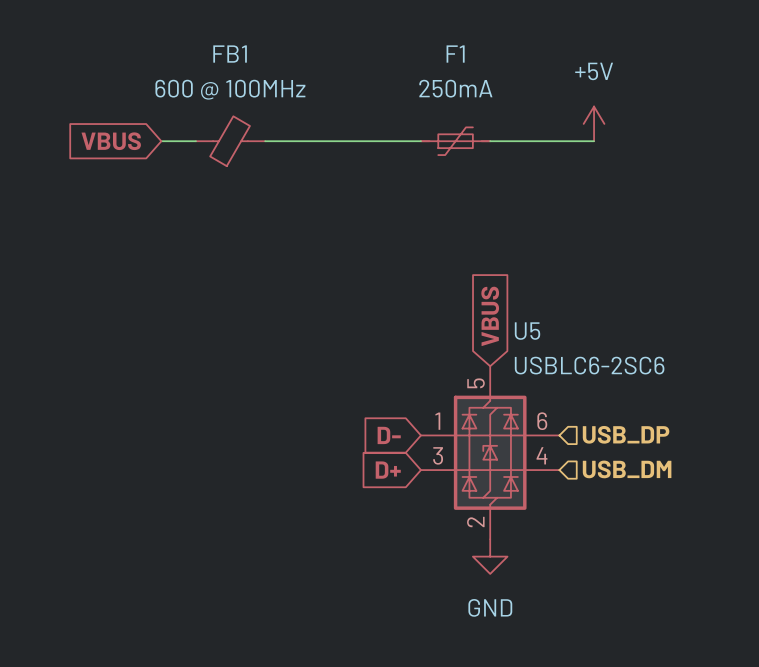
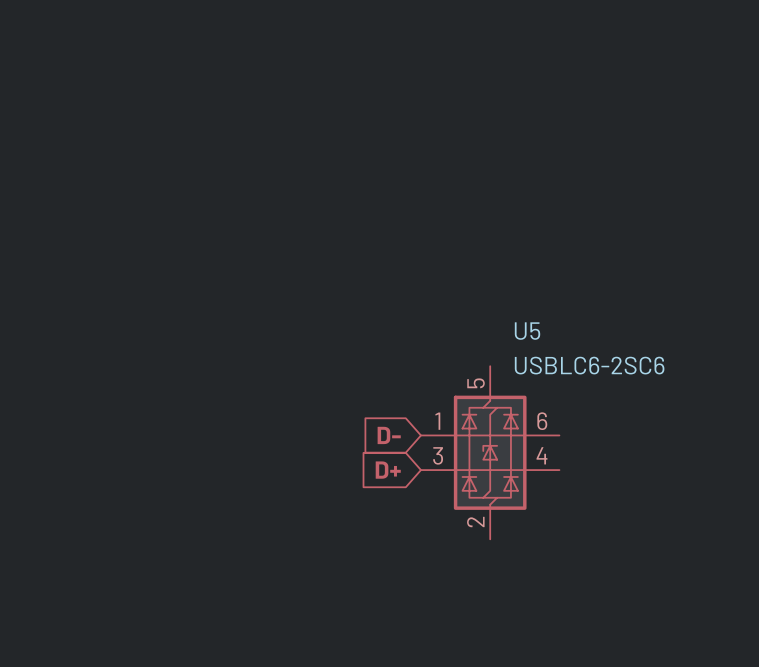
power symbol: +5V (594, 123) -> none
global label: VBUS (111, 141) -> none
wire: (161, 141) (195, 141) -> none
FB1: 600 @ 100MHz (230, 141) -> none
wire: (265, 141) (420, 141) -> none
F1: 250mA (455, 141) -> none
wire: (490, 141) (594, 141) -> none
global label: VBUS (490, 316) -> none
hierarchical label: USB_DP (626, 434) -> none
hierarchical label: USB_DM (627, 469) -> none
power symbol: GND (490, 556) -> none

